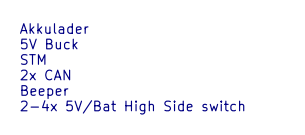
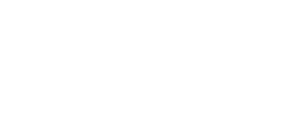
text: Akkulader (54, 28) -> none
text: 5V Buck (49, 43) -> none
text: STM (33, 59) -> none
text: 2x CAN (45, 74) -> none
text: Beeper (44, 92) -> none
text: 2-4x 5V/Bat High Side switch (132, 107) -> none

